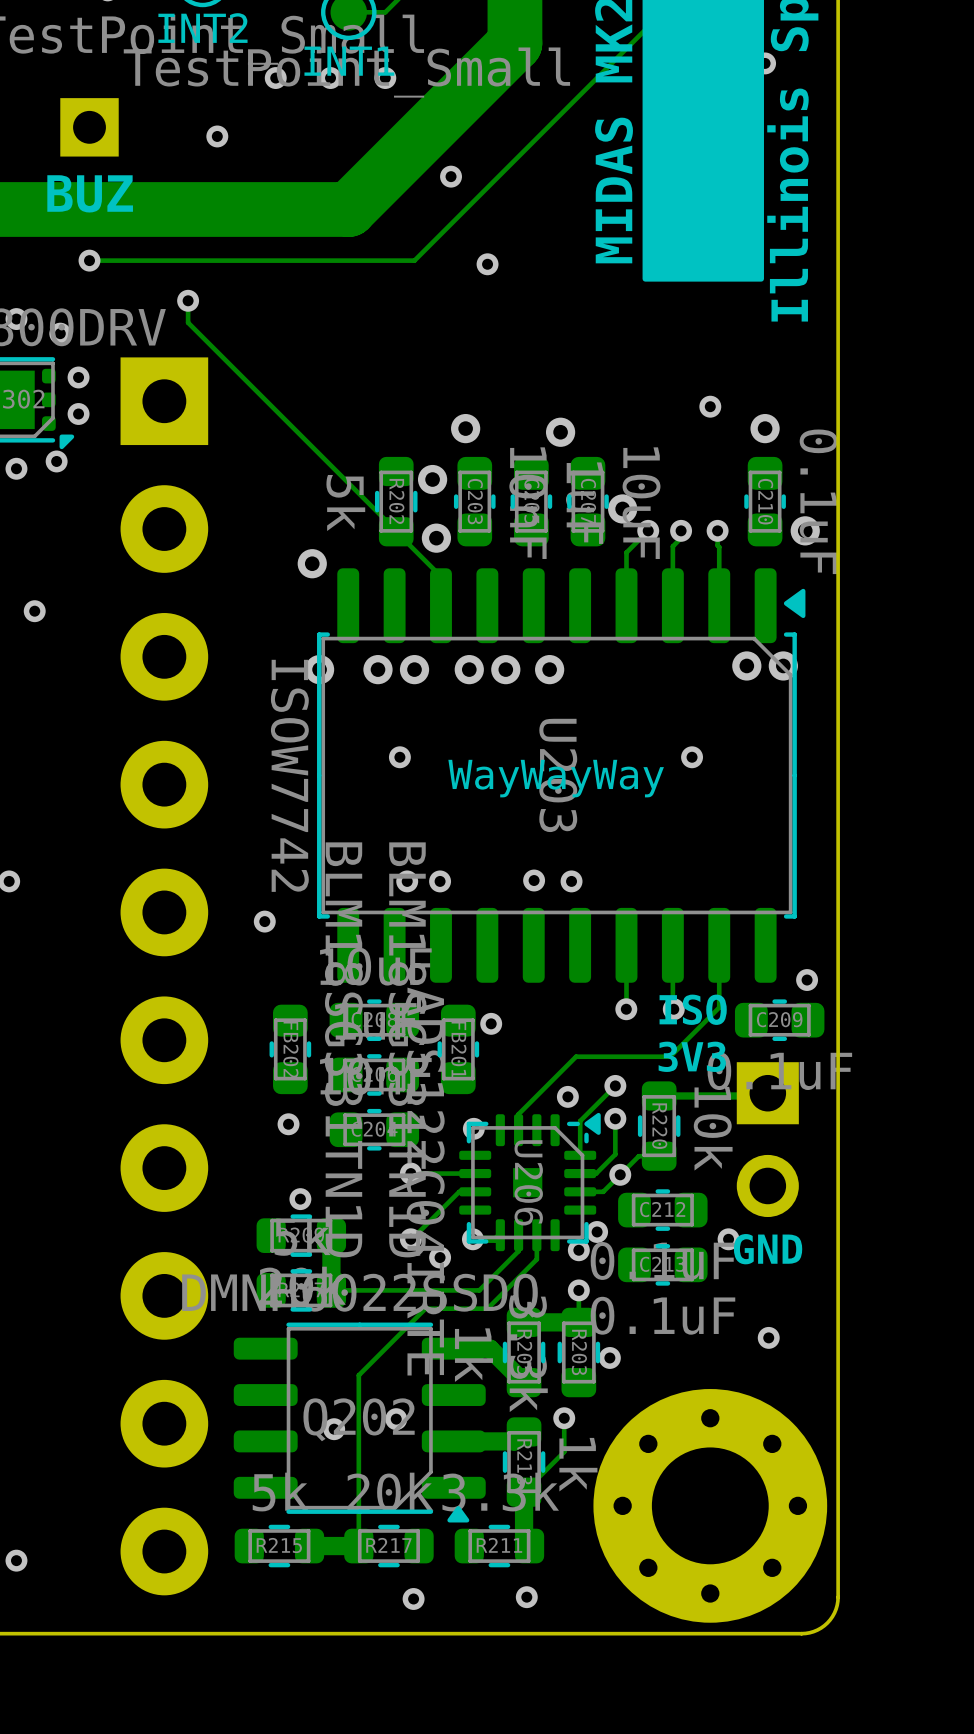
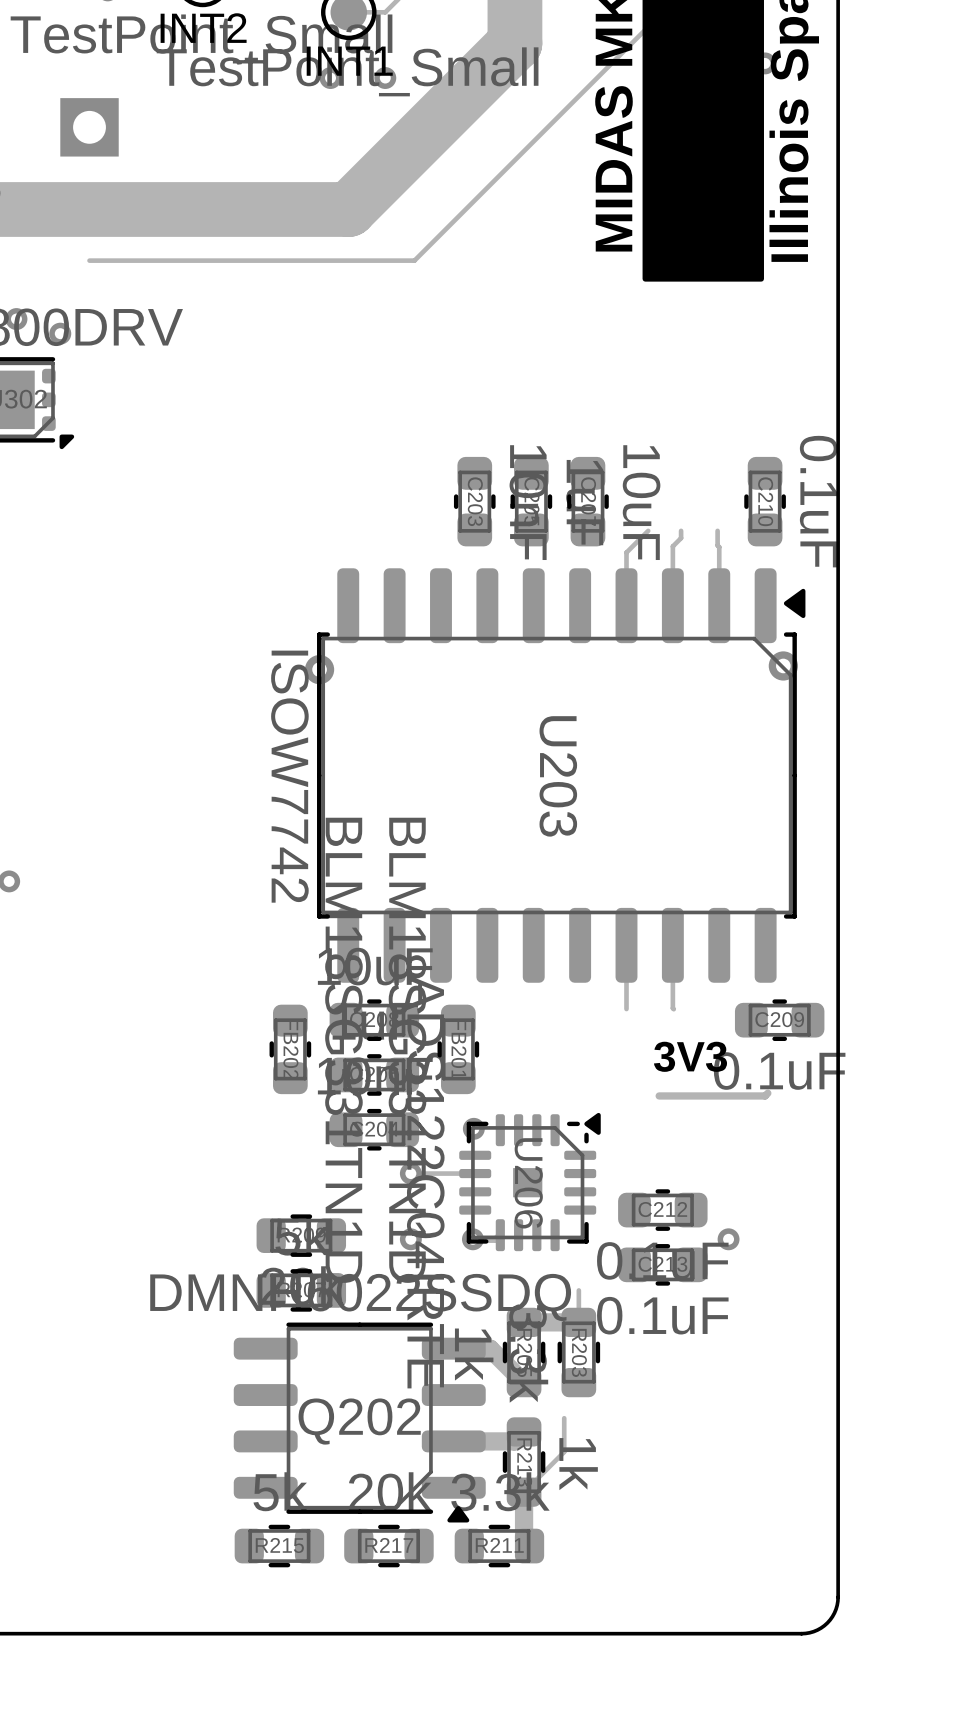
via: (275, 78) -> none
via: (217, 136) -> none
via: (451, 176) -> none
text: BUZ (90, 193) -> none
via: (89, 260) -> none
via: (487, 264) -> none
track: (188, 300) (188, 322) (440, 576) (440, 605) -> none
via: (188, 300) -> none
via: (78, 377) -> none
via: (710, 406) -> none
via: (78, 413) -> none
via: (465, 428) -> none
via: (765, 428) -> none
via: (560, 432) -> none
via: (56, 461) -> none
via: (16, 468) -> none
via: (432, 479) -> none
R202: 5k (396, 501) -> none
via: (622, 508) -> none
via: (648, 530) -> none
via: (681, 530) -> none
via: (717, 530) -> none
via: (805, 530) -> none
via: (436, 538) -> none
via: (312, 563) -> none
via: (34, 611) -> none
via: (746, 665) -> none
via: (377, 669) -> none
via: (414, 669) -> none
via: (469, 669) -> none
via: (505, 669) -> none
via: (549, 669) -> none
via: (399, 757) -> none
via: (692, 757) -> none
text: WayWayWay (556, 778) -> none
via: (534, 880) -> none
via: (407, 881) -> none
via: (440, 881) -> none
via: (571, 881) -> none
via: (264, 921) -> none
track: (719, 945) (719, 1007) (670, 1056) (576, 1056) (518, 1114) (518, 1130) -> none
part: (164, 976) -> none
via: (807, 980) -> none
via: (626, 1009) -> none
via: (673, 1009) -> none
text: ISO (693, 1009) -> none
via: (491, 1023) -> none
track: (615, 1085) (580, 1121) (580, 1155) -> none
via: (615, 1085) -> none
via: (567, 1096) -> none
track: (615, 1118) (615, 1154) (596, 1173) (580, 1173) -> none
via: (615, 1118) -> none
via: (288, 1124) -> none
R220: 10k (659, 1126) -> none
part: (767, 1139) -> none
track: (659, 1156) (638, 1156) (603, 1191) (580, 1191) -> none
via: (620, 1174) -> none
track: (475, 1191) (459, 1191) (410, 1239) -> none
via: (300, 1199) -> none
via: (597, 1231) -> none
track: (518, 1235) (518, 1251) (479, 1290) (331, 1290) (331, 1235) -> none
track: (536, 1235) (536, 1259) (487, 1308) (425, 1308) (358, 1375) (358, 1546) (309, 1546) -> none
text: GND (768, 1249) -> none
via: (578, 1250) -> none
via: (440, 1257) -> none
via: (578, 1290) -> none
via: (768, 1337) -> none
via: (609, 1357) -> none
via: (564, 1418) -> none
via: (396, 1419) -> none
via: (334, 1429) -> none
part: (710, 1505) -> none
via: (16, 1560) -> none
via: (526, 1597) -> none
via: (413, 1598) -> none

